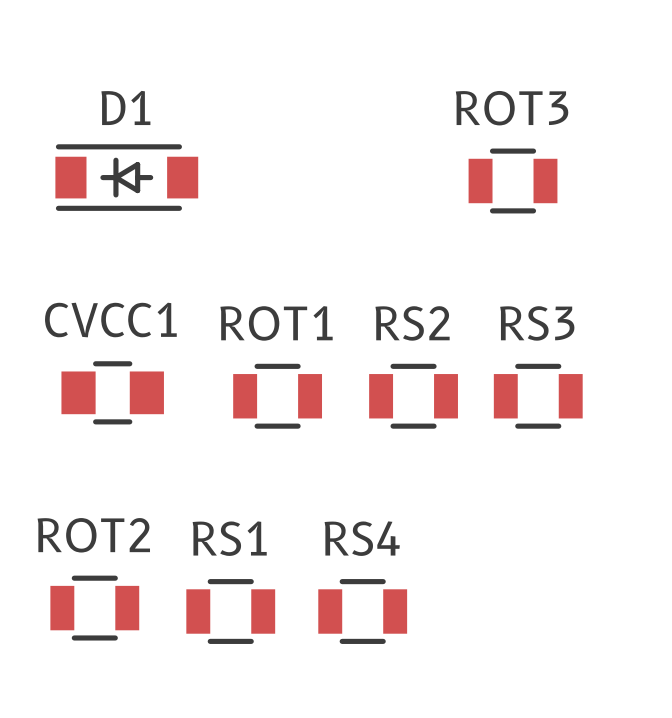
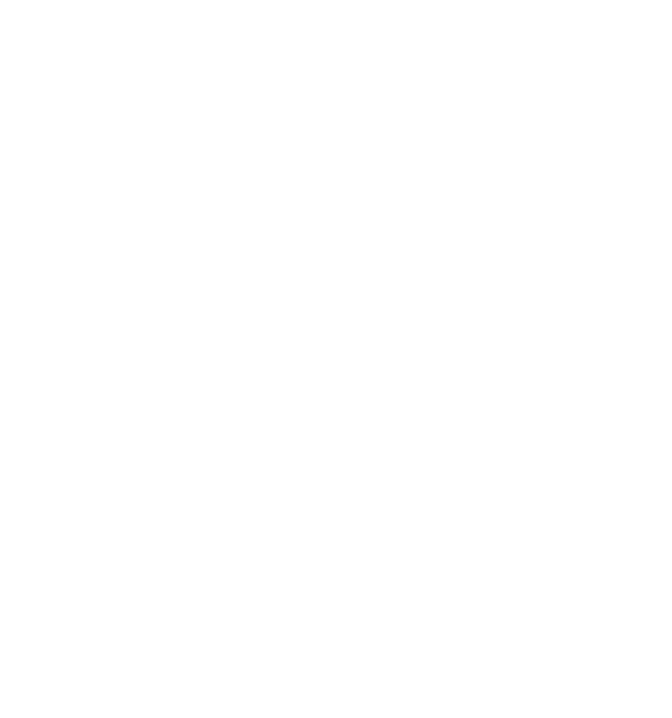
D1: (126, 177) -> none
ROT3: (513, 180) -> none
CVCC1: (112, 392) -> none
ROT1: (277, 396) -> none
RS2: (413, 396) -> none
RS3: (538, 396) -> none
ROT2: (94, 608) -> none
RS1: (230, 611) -> none
RS4: (362, 611) -> none

